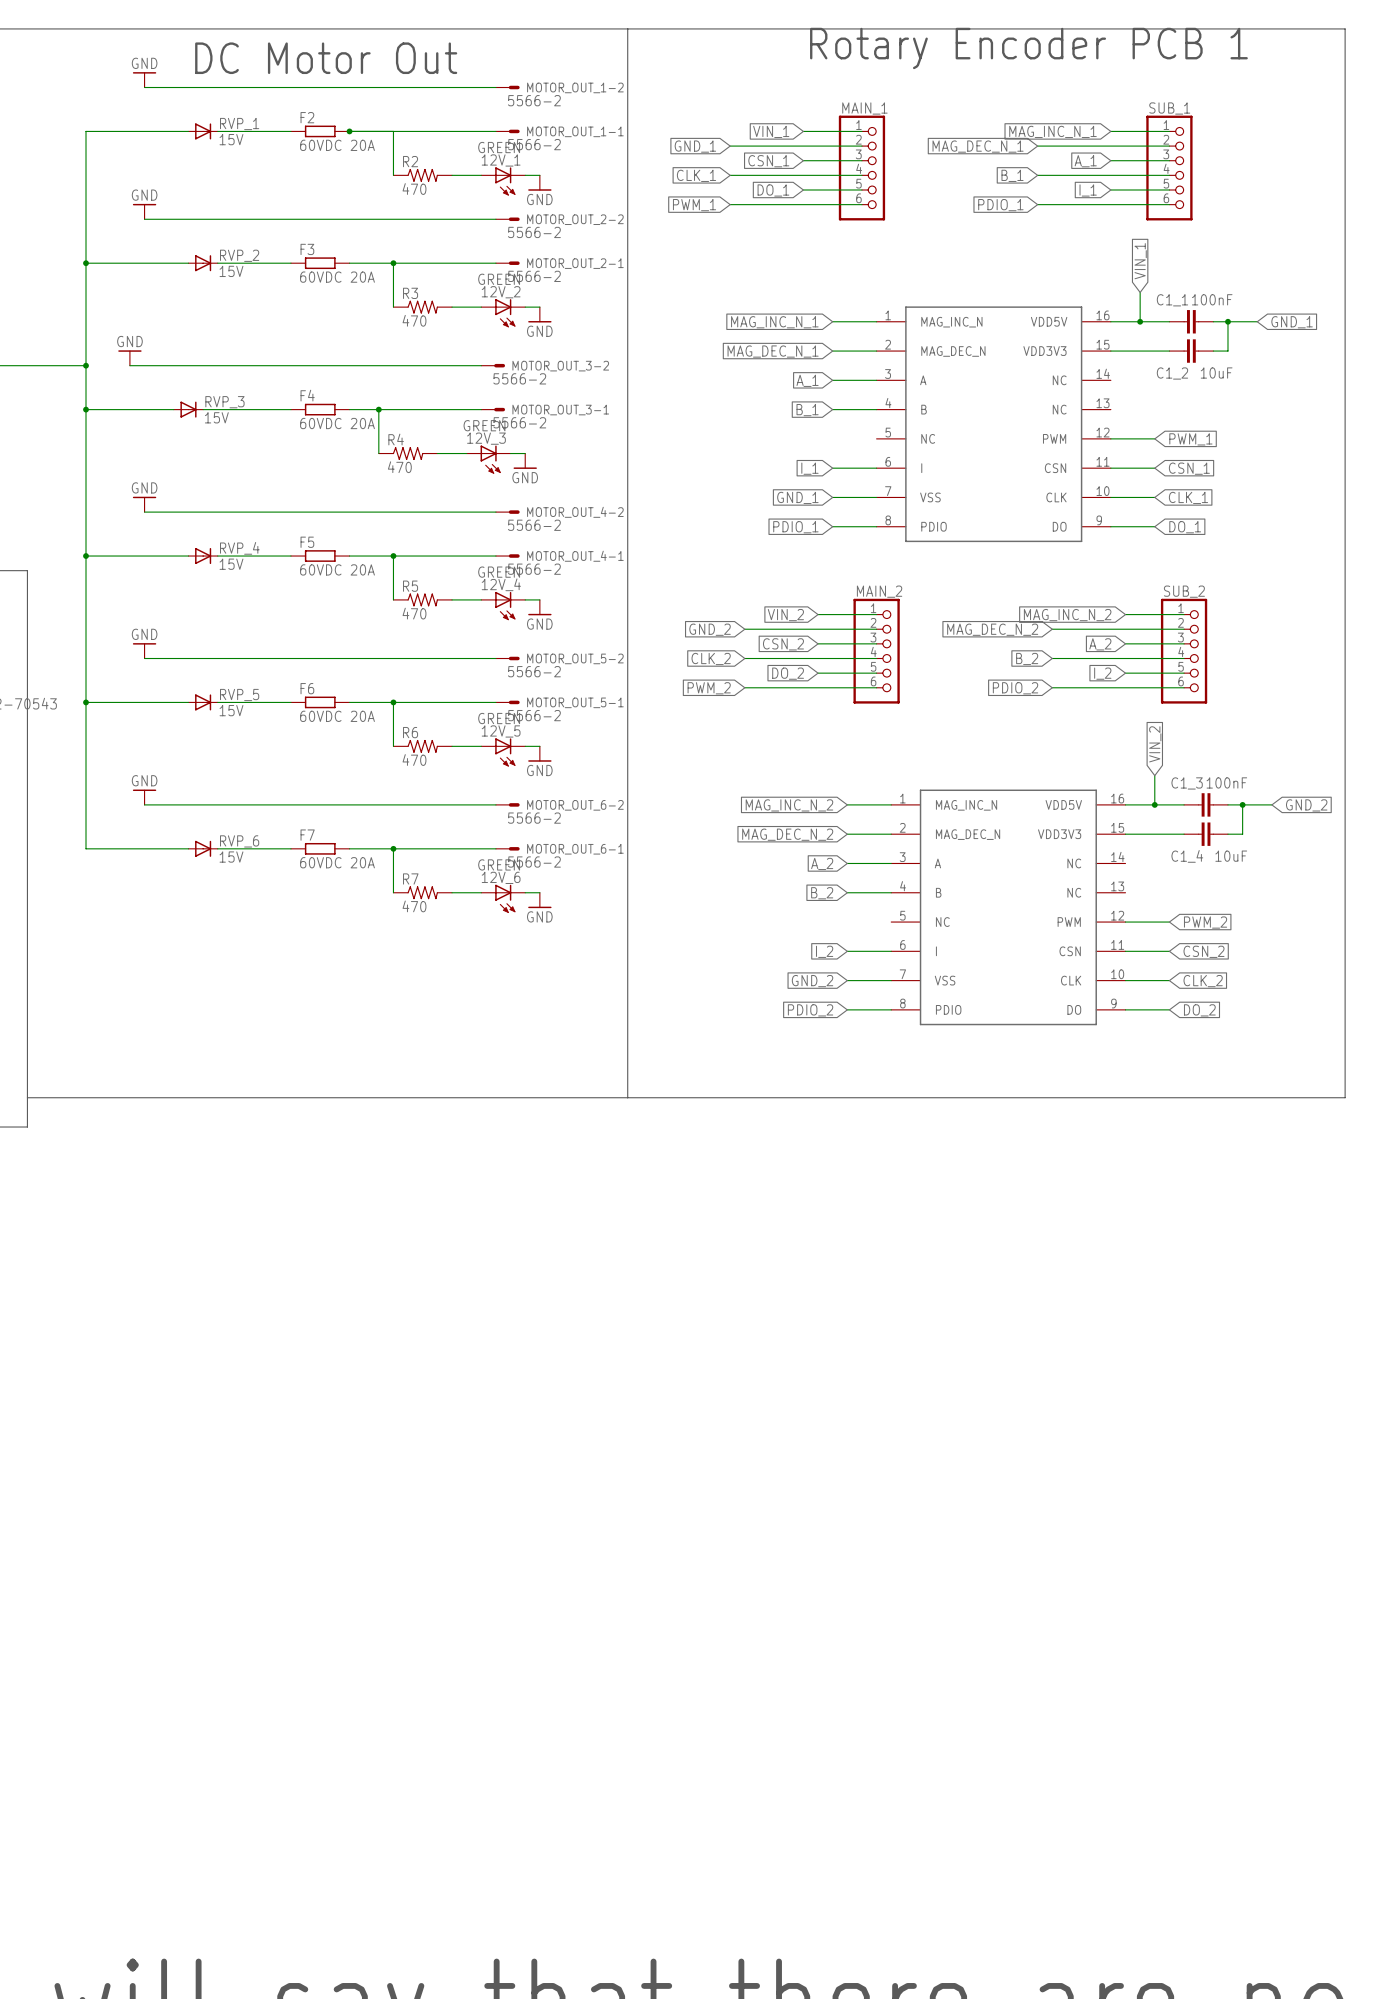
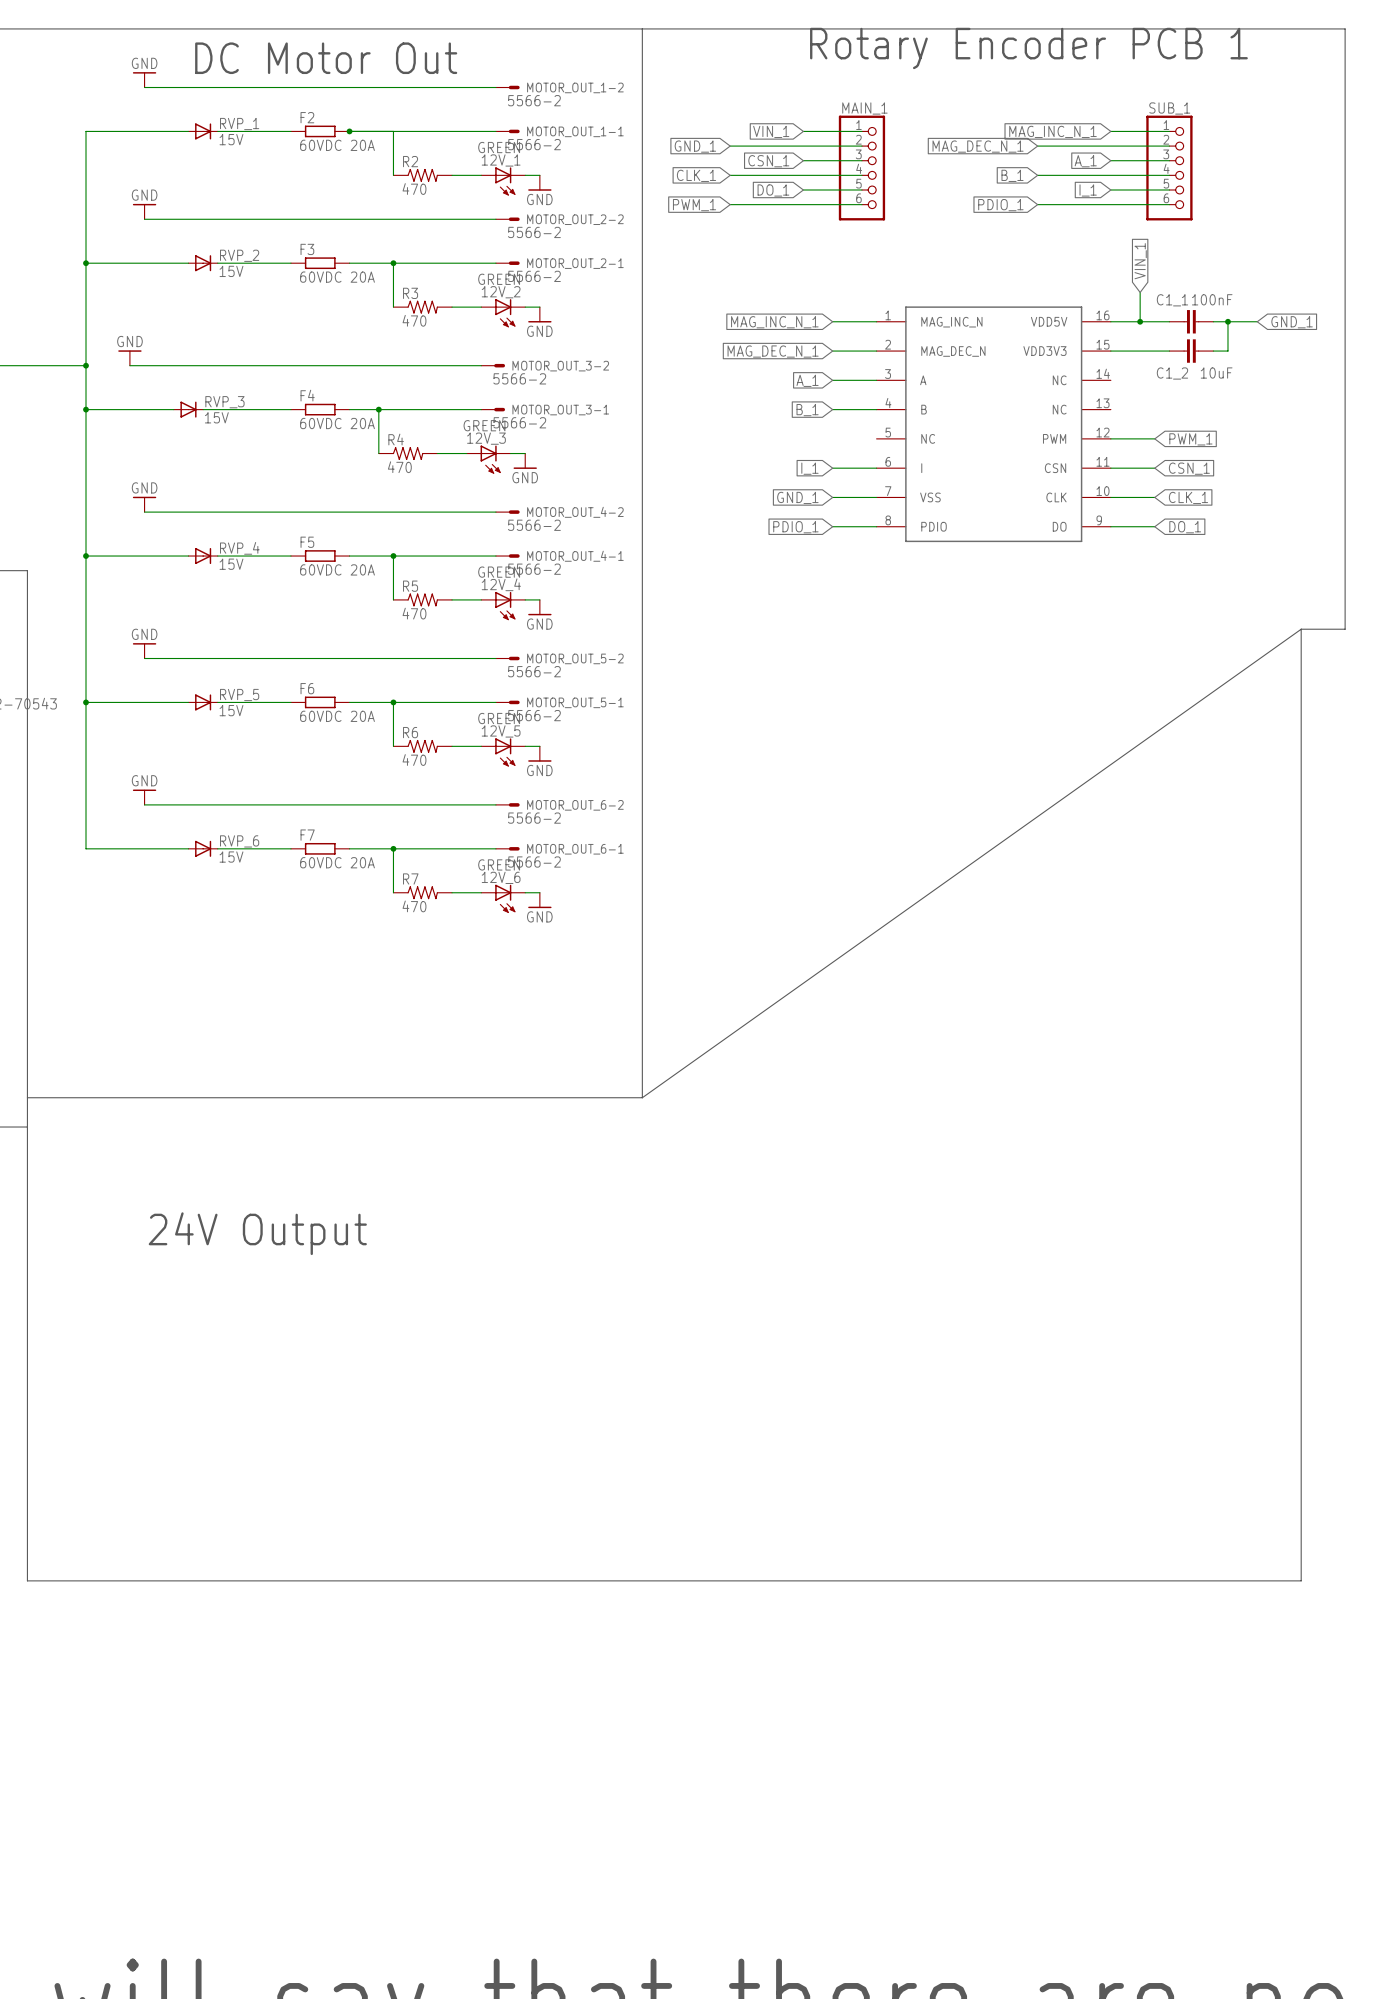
line: (627, 28) (627, 1097) -> none
line: none -> (642, 28) (642, 1097) (1301, 629)
wire: (818, 614) (876, 614) -> none
wire: (1125, 614) (1184, 614) -> none
global label: VIN_2 (785, 615) -> none
global label: MAG_INC_N_2 (1067, 615) -> none
global label: GND_2 (710, 629) -> none
wire: (744, 629) (876, 629) -> none
global label: MAG_DEC_N_2 (992, 629) -> none
wire: (1052, 629) (1184, 629) -> none
line: none -> (1301, 629) (1301, 1580) (27, 1580) (27, 1127)
line: (1345, 629) (1345, 1097) (642, 1097) -> (1345, 629) (1301, 629)
wire: (818, 643) (876, 643) -> none
wire: (1125, 643) (1184, 643) -> none
global label: CSN_2 (783, 644) -> none
global label: A_2 (1100, 644) -> none
MAIN_2: (876, 651) -> none
SUB_2: (1184, 651) -> none
global label: CLK_2 (711, 658) -> none
wire: (744, 658) (876, 658) -> none
global label: B_2 (1027, 658) -> none
wire: (1052, 658) (1184, 658) -> none
global label: DO_2 (788, 673) -> none
wire: (818, 673) (876, 673) -> none
global label: I_2 (1102, 673) -> none
wire: (1125, 673) (1184, 673) -> none
wire: (744, 687) (876, 687) -> none
wire: (1052, 687) (1184, 687) -> none
global label: PWM_2 (709, 688) -> none
global label: PDIO_2 (1015, 688) -> none
global label: VIN_2 (1155, 744) -> none
wire: (1154, 775) (1154, 804) -> none
wire: (847, 804) (891, 804) -> none
wire: (1125, 804) (1184, 804) -> none
junction: (1154, 804) -> none
C1_3: 100nF (1206, 804) -> none
wire: (1227, 804) (1271, 804) -> none
wire: (1242, 804) (1242, 834) (1227, 834) -> none
junction: (1242, 804) -> none
global label: MAG_INC_N_2 (789, 805) -> none
global label: GND_2 (1306, 805) -> none
global label: MAG_DEC_N_2 (787, 834) -> none
wire: (847, 834) (891, 834) -> none
wire: (1125, 834) (1184, 834) -> none
C1_4: 10uF (1206, 834) -> none
global label: A_2 (822, 863) -> none
wire: (847, 863) (891, 863) -> none
wire: (847, 892) (891, 892) -> none
global label: B_2 (822, 893) -> none
part: (1008, 907) -> none
wire: (1125, 922) (1169, 922) -> none
global label: PWM_2 (1205, 922) -> none
global label: I_2 (824, 951) -> none
wire: (847, 951) (891, 951) -> none
wire: (1125, 951) (1169, 951) -> none
global label: CSN_2 (1204, 951) -> none
wire: (847, 980) (891, 980) -> none
wire: (1125, 980) (1169, 980) -> none
global label: GND_2 (812, 981) -> none
global label: CLK_2 (1203, 981) -> none
wire: (847, 1009) (891, 1009) -> none
wire: (1125, 1009) (1169, 1009) -> none
global label: PDIO_2 (810, 1010) -> none
global label: DO_2 (1199, 1010) -> none
text: none -> 24V Output (257, 1233)

